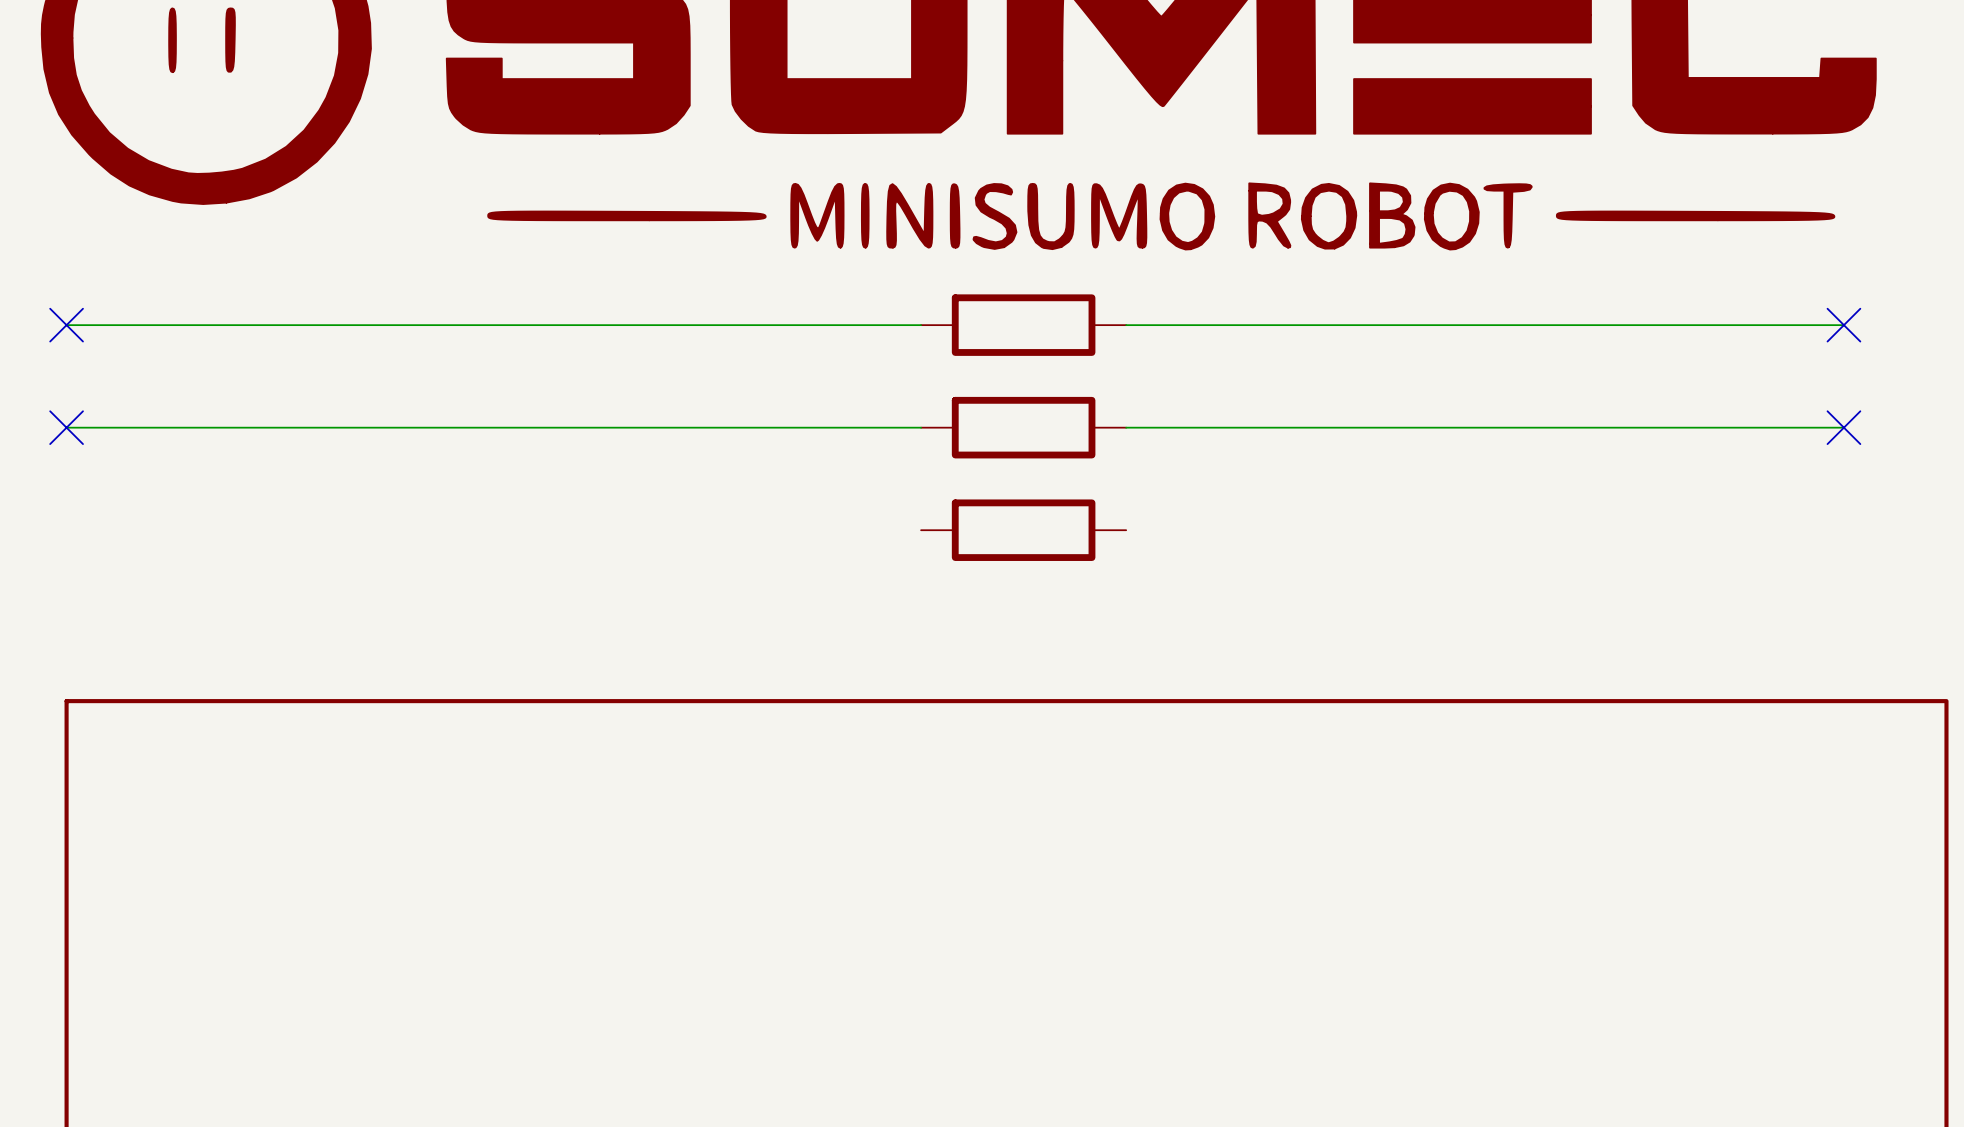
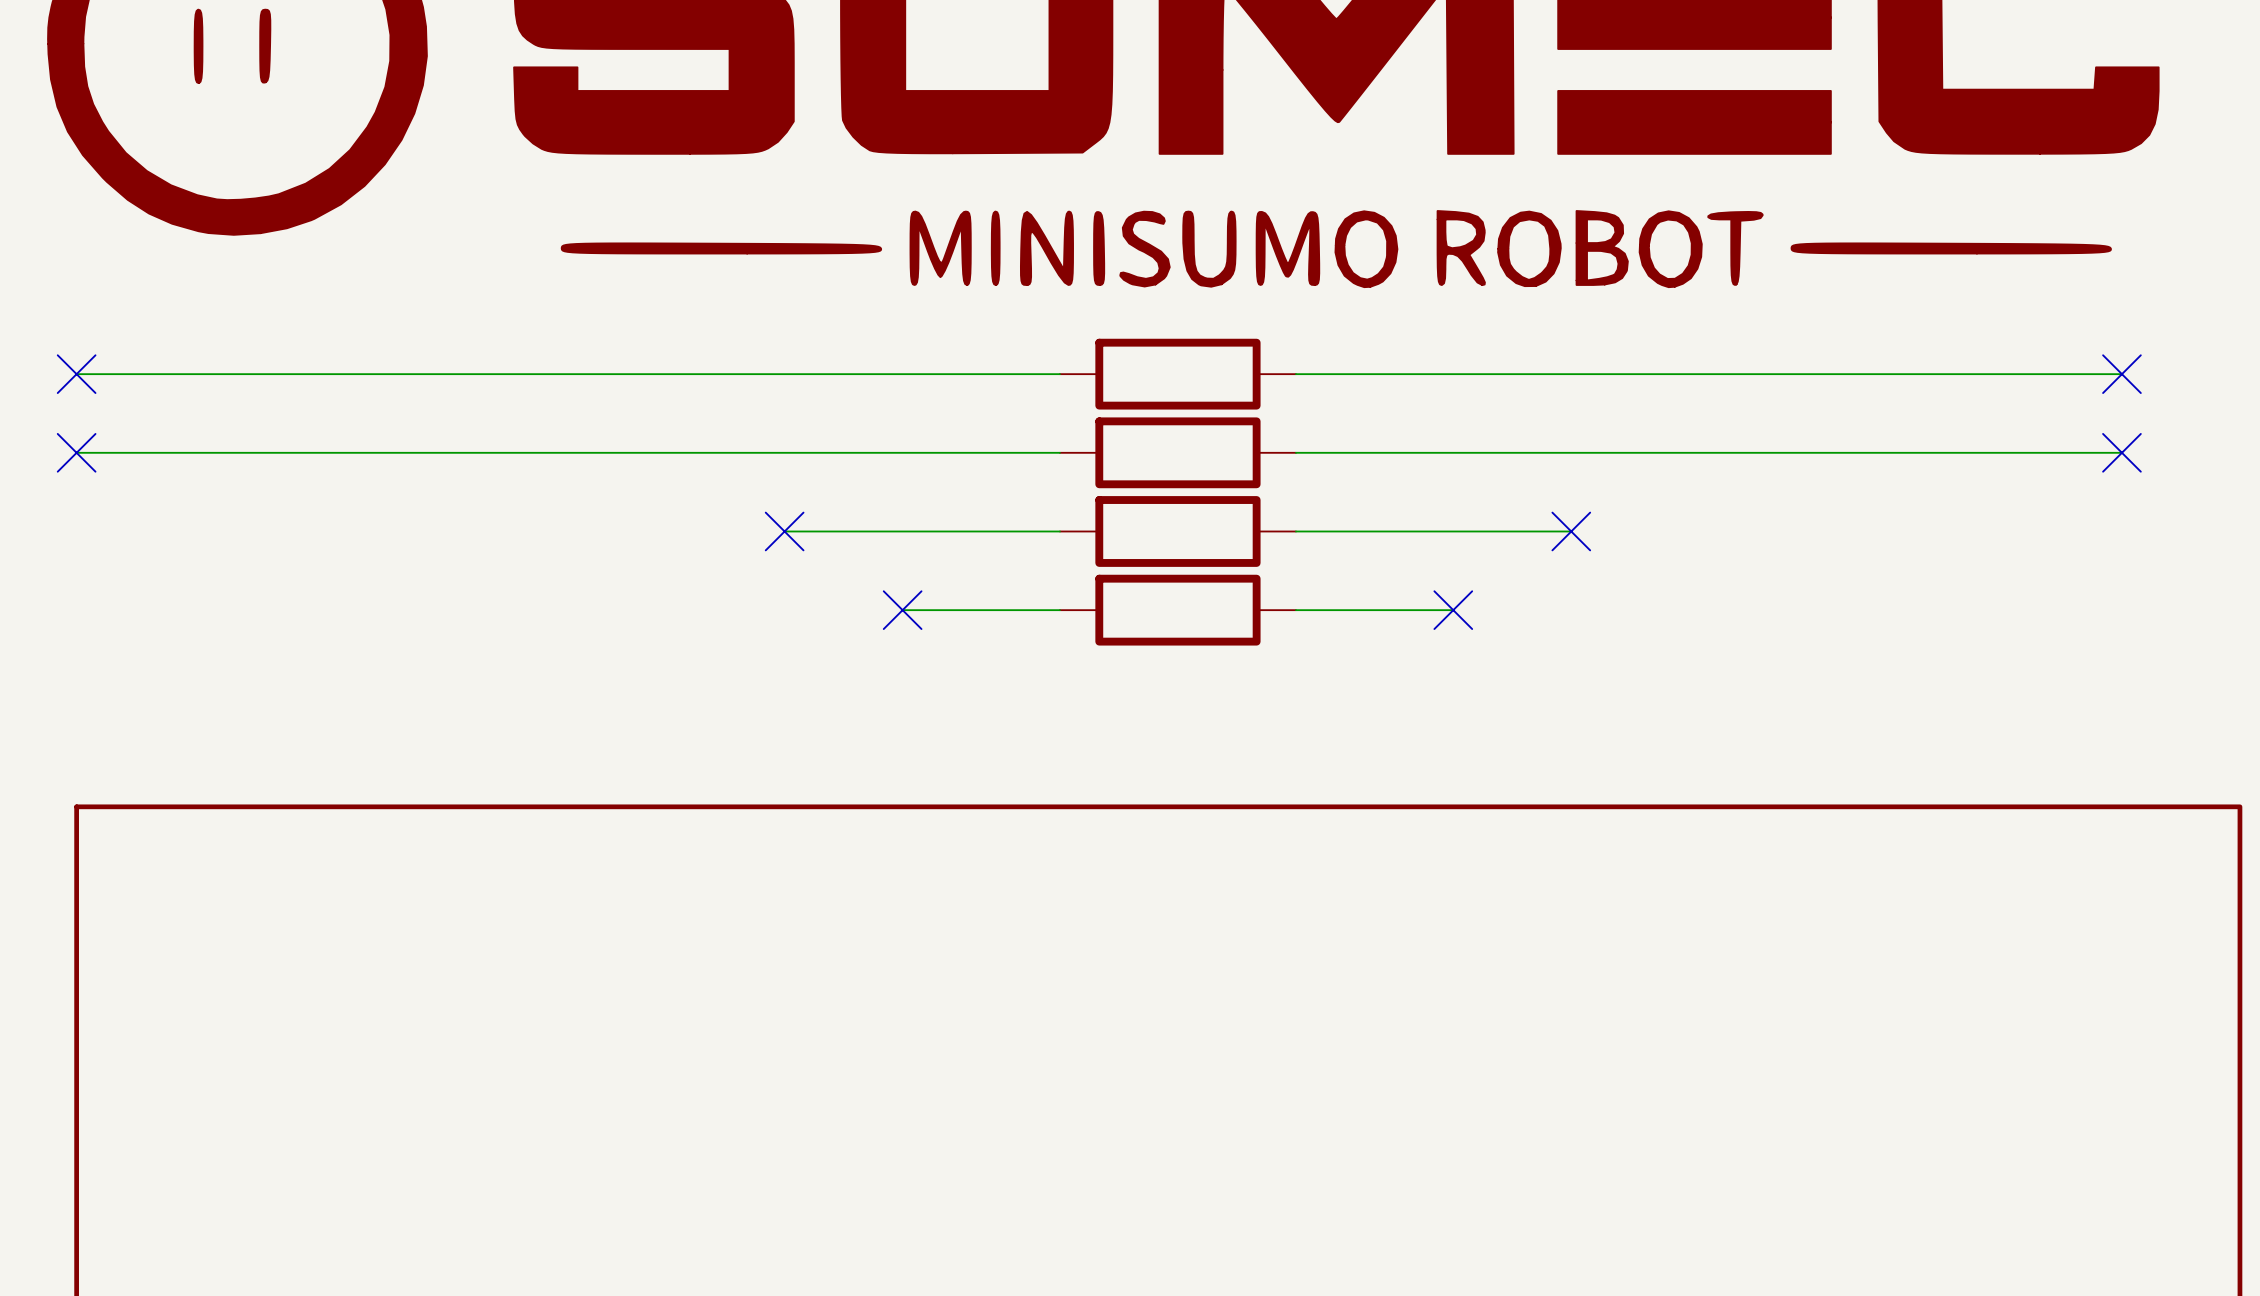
part: none -> (1177, 452)
wire: (66, 427) (921, 427) -> (76, 452) (1059, 452)
no-connect mark position: (66, 427) -> (76, 452)
part: (1023, 427) -> none
wire: (1126, 427) (1843, 427) -> (1295, 452) (2121, 452)
no-connect mark position: (1843, 427) -> (2121, 452)
wire: none -> (784, 531) (1059, 531)
no-connect mark: none -> (784, 531)
part: none -> (1177, 531)
wire: none -> (1295, 531) (1571, 531)
no-connect mark: none -> (1571, 531)
wire: none -> (902, 610) (1059, 610)
no-connect mark: none -> (902, 610)
wire: none -> (1295, 610) (1453, 610)
no-connect mark: none -> (1453, 610)

